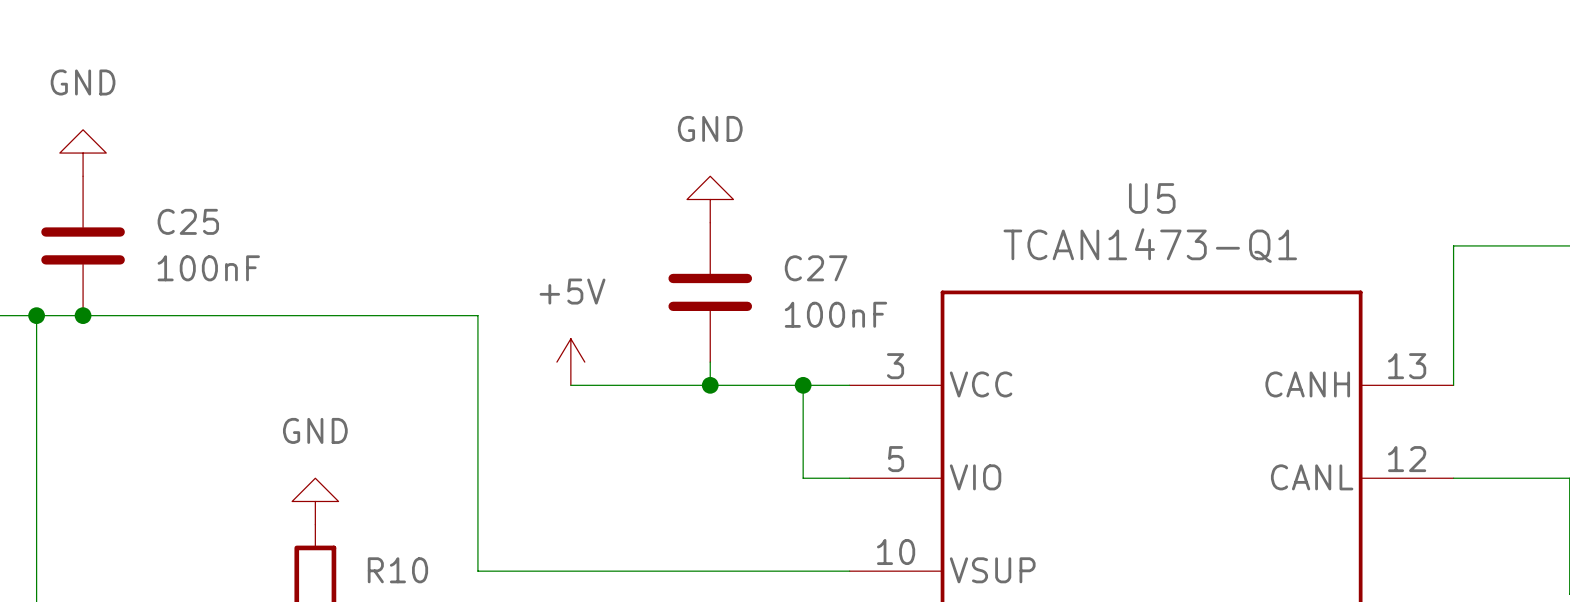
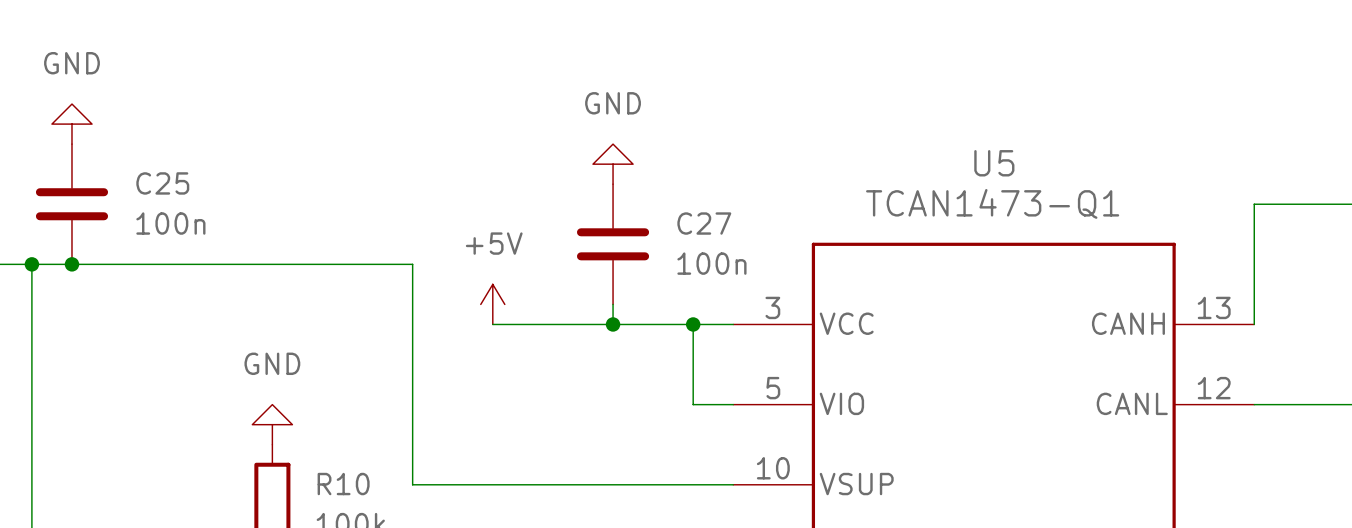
C25 value: 100nF (208, 268) -> 100n (170, 223)
C27 value: 100nF (835, 314) -> 100n (711, 263)

